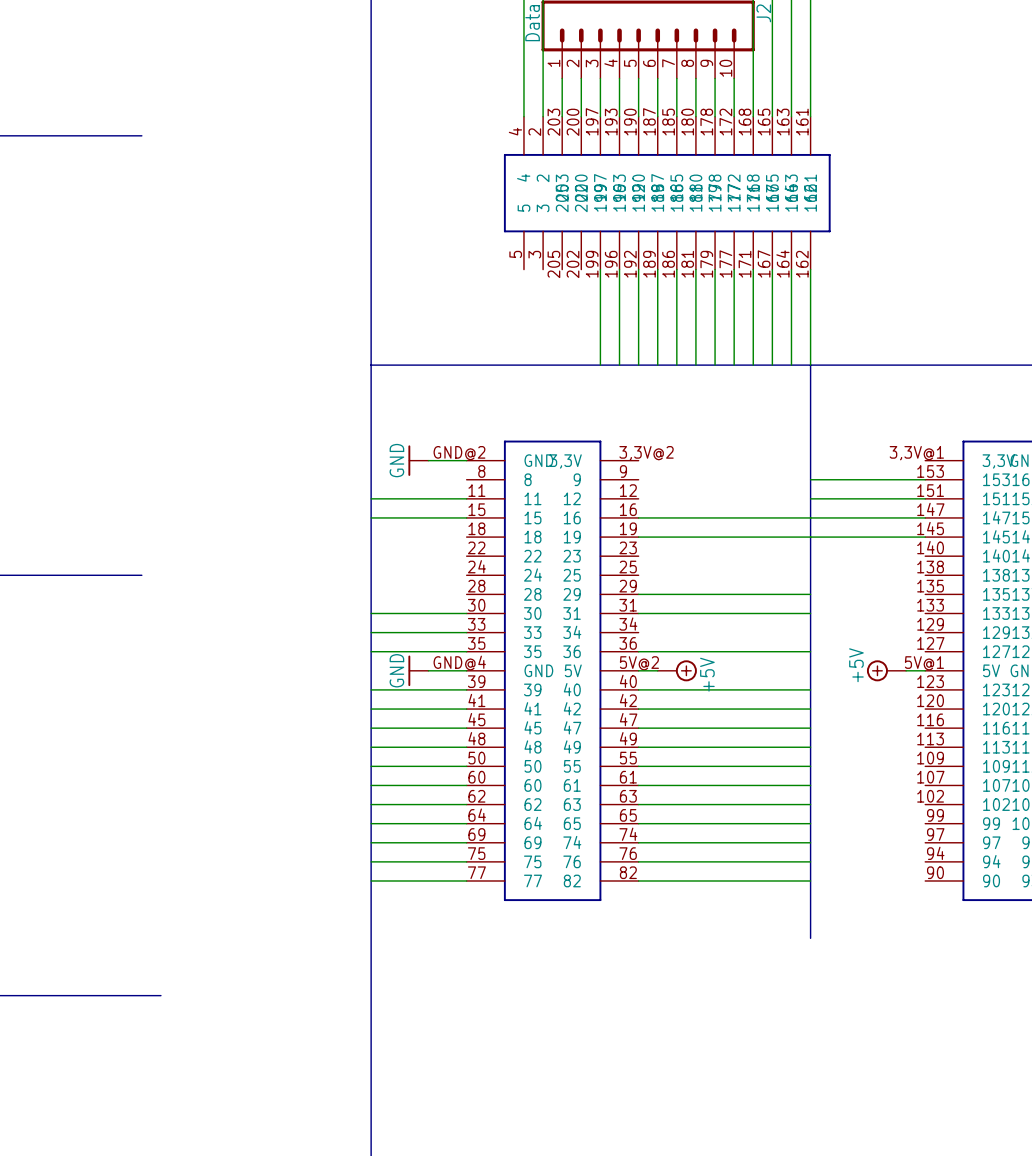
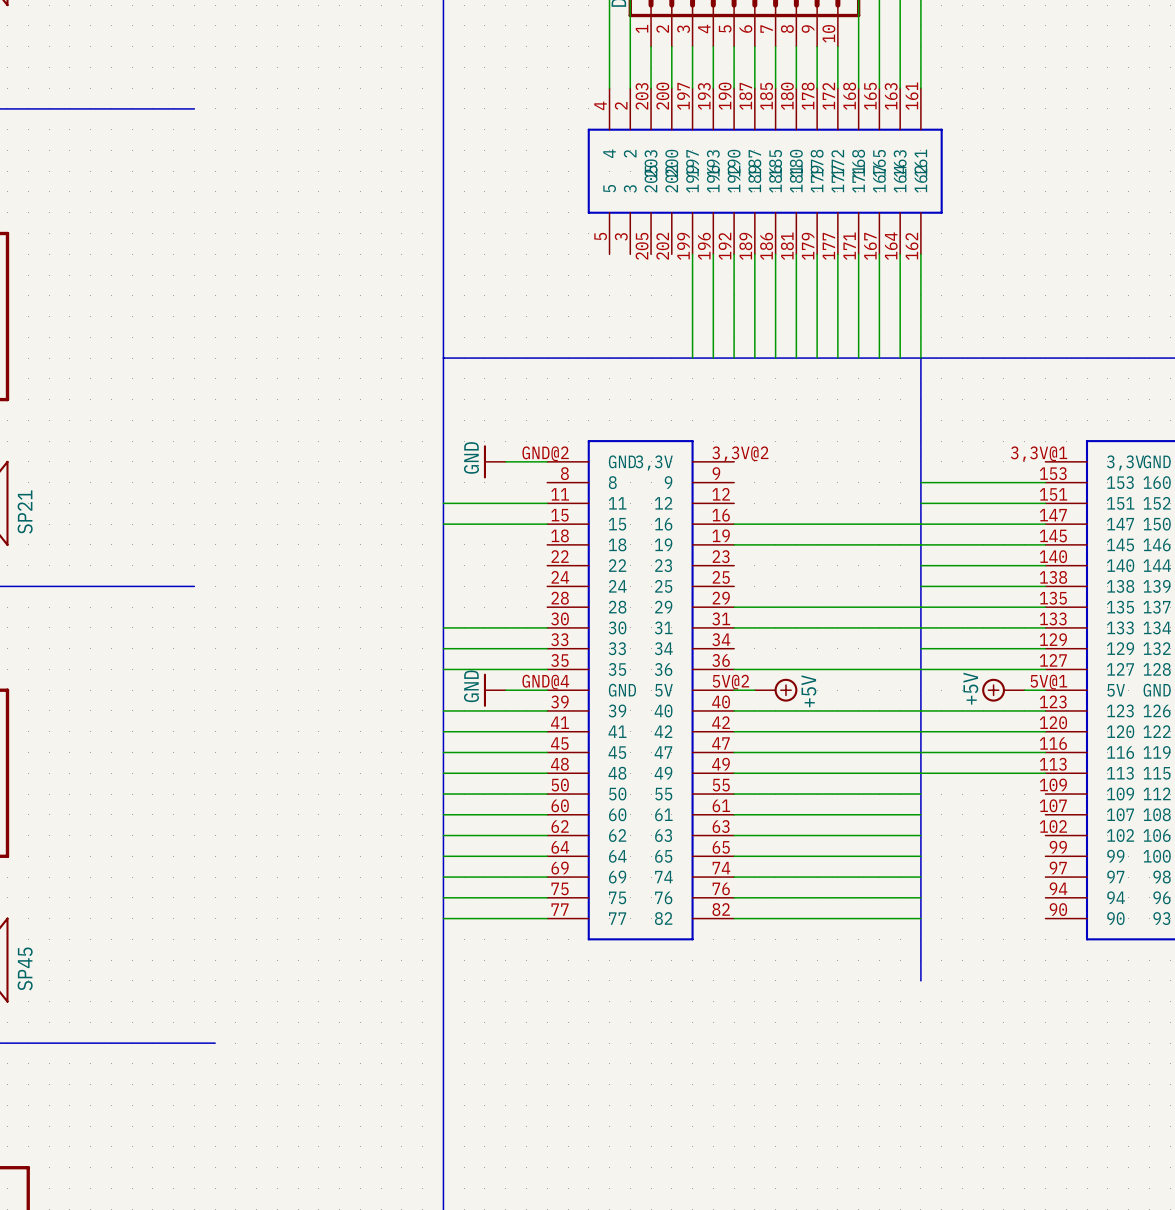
wire: none -> (920, 565) (1045, 565)
wire: none -> (920, 586) (1045, 586)
wire: none -> (920, 607) (1045, 607)
wire: none -> (920, 627) (1045, 627)
wire: none -> (920, 648) (1045, 648)
wire: none -> (920, 669) (1045, 669)
wire: none -> (920, 710) (1045, 710)
wire: none -> (920, 731) (1045, 731)
wire: none -> (920, 752) (1045, 752)
wire: none -> (920, 773) (1045, 773)

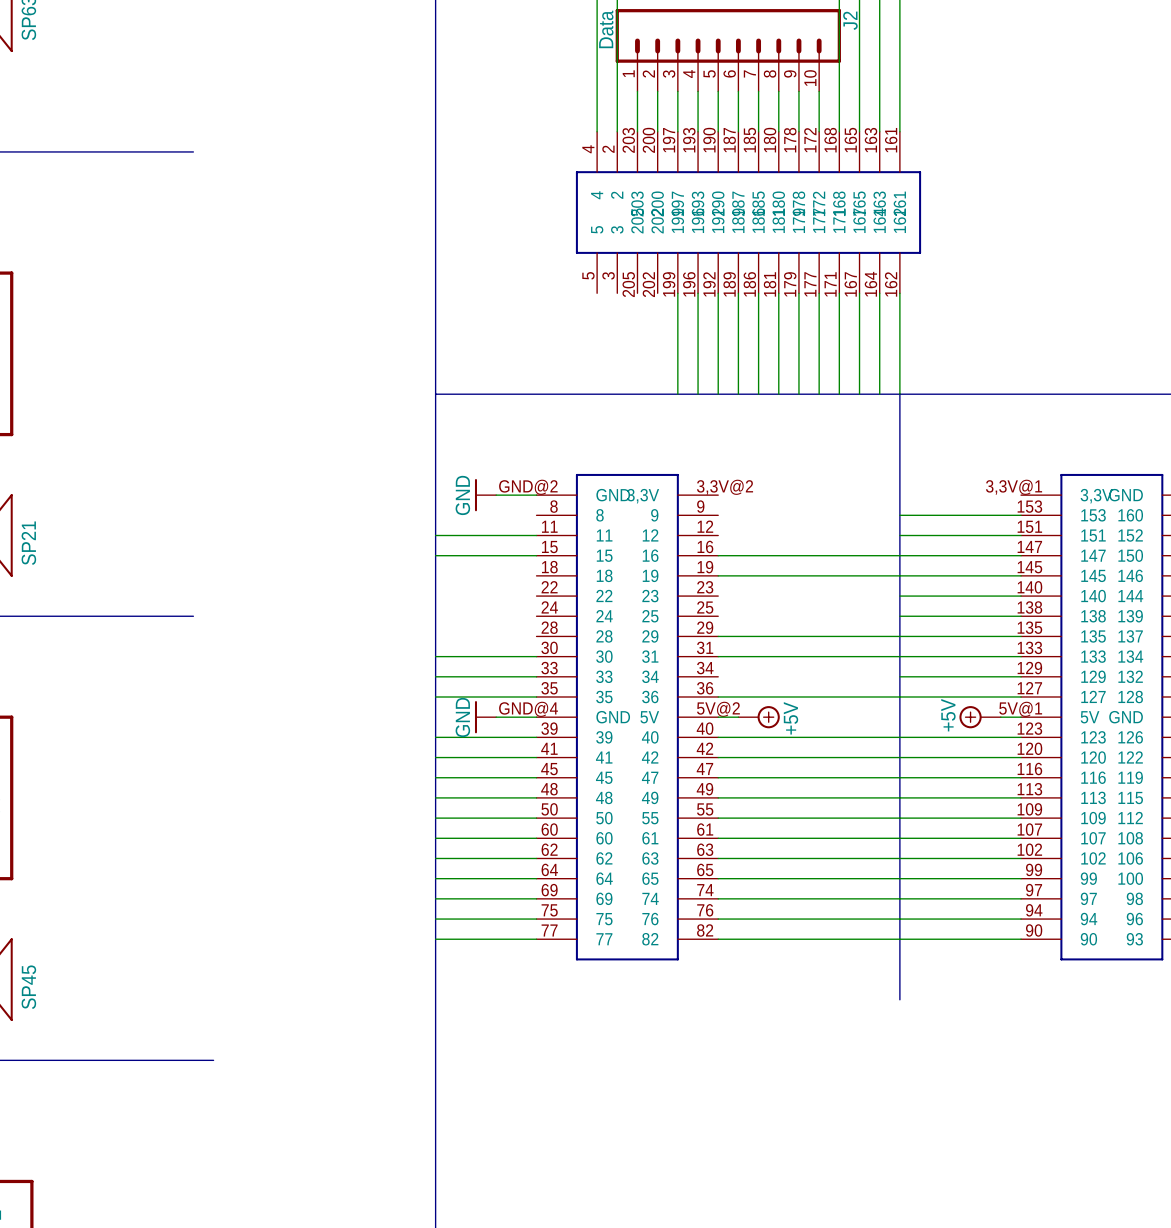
wire: none -> (899, 818) (1021, 818)
wire: none -> (899, 838) (1021, 838)
wire: none -> (899, 858) (1021, 858)
wire: none -> (899, 878) (1021, 878)
wire: none -> (899, 898) (1021, 898)
wire: none -> (899, 919) (1021, 919)
wire: none -> (899, 939) (1021, 939)

